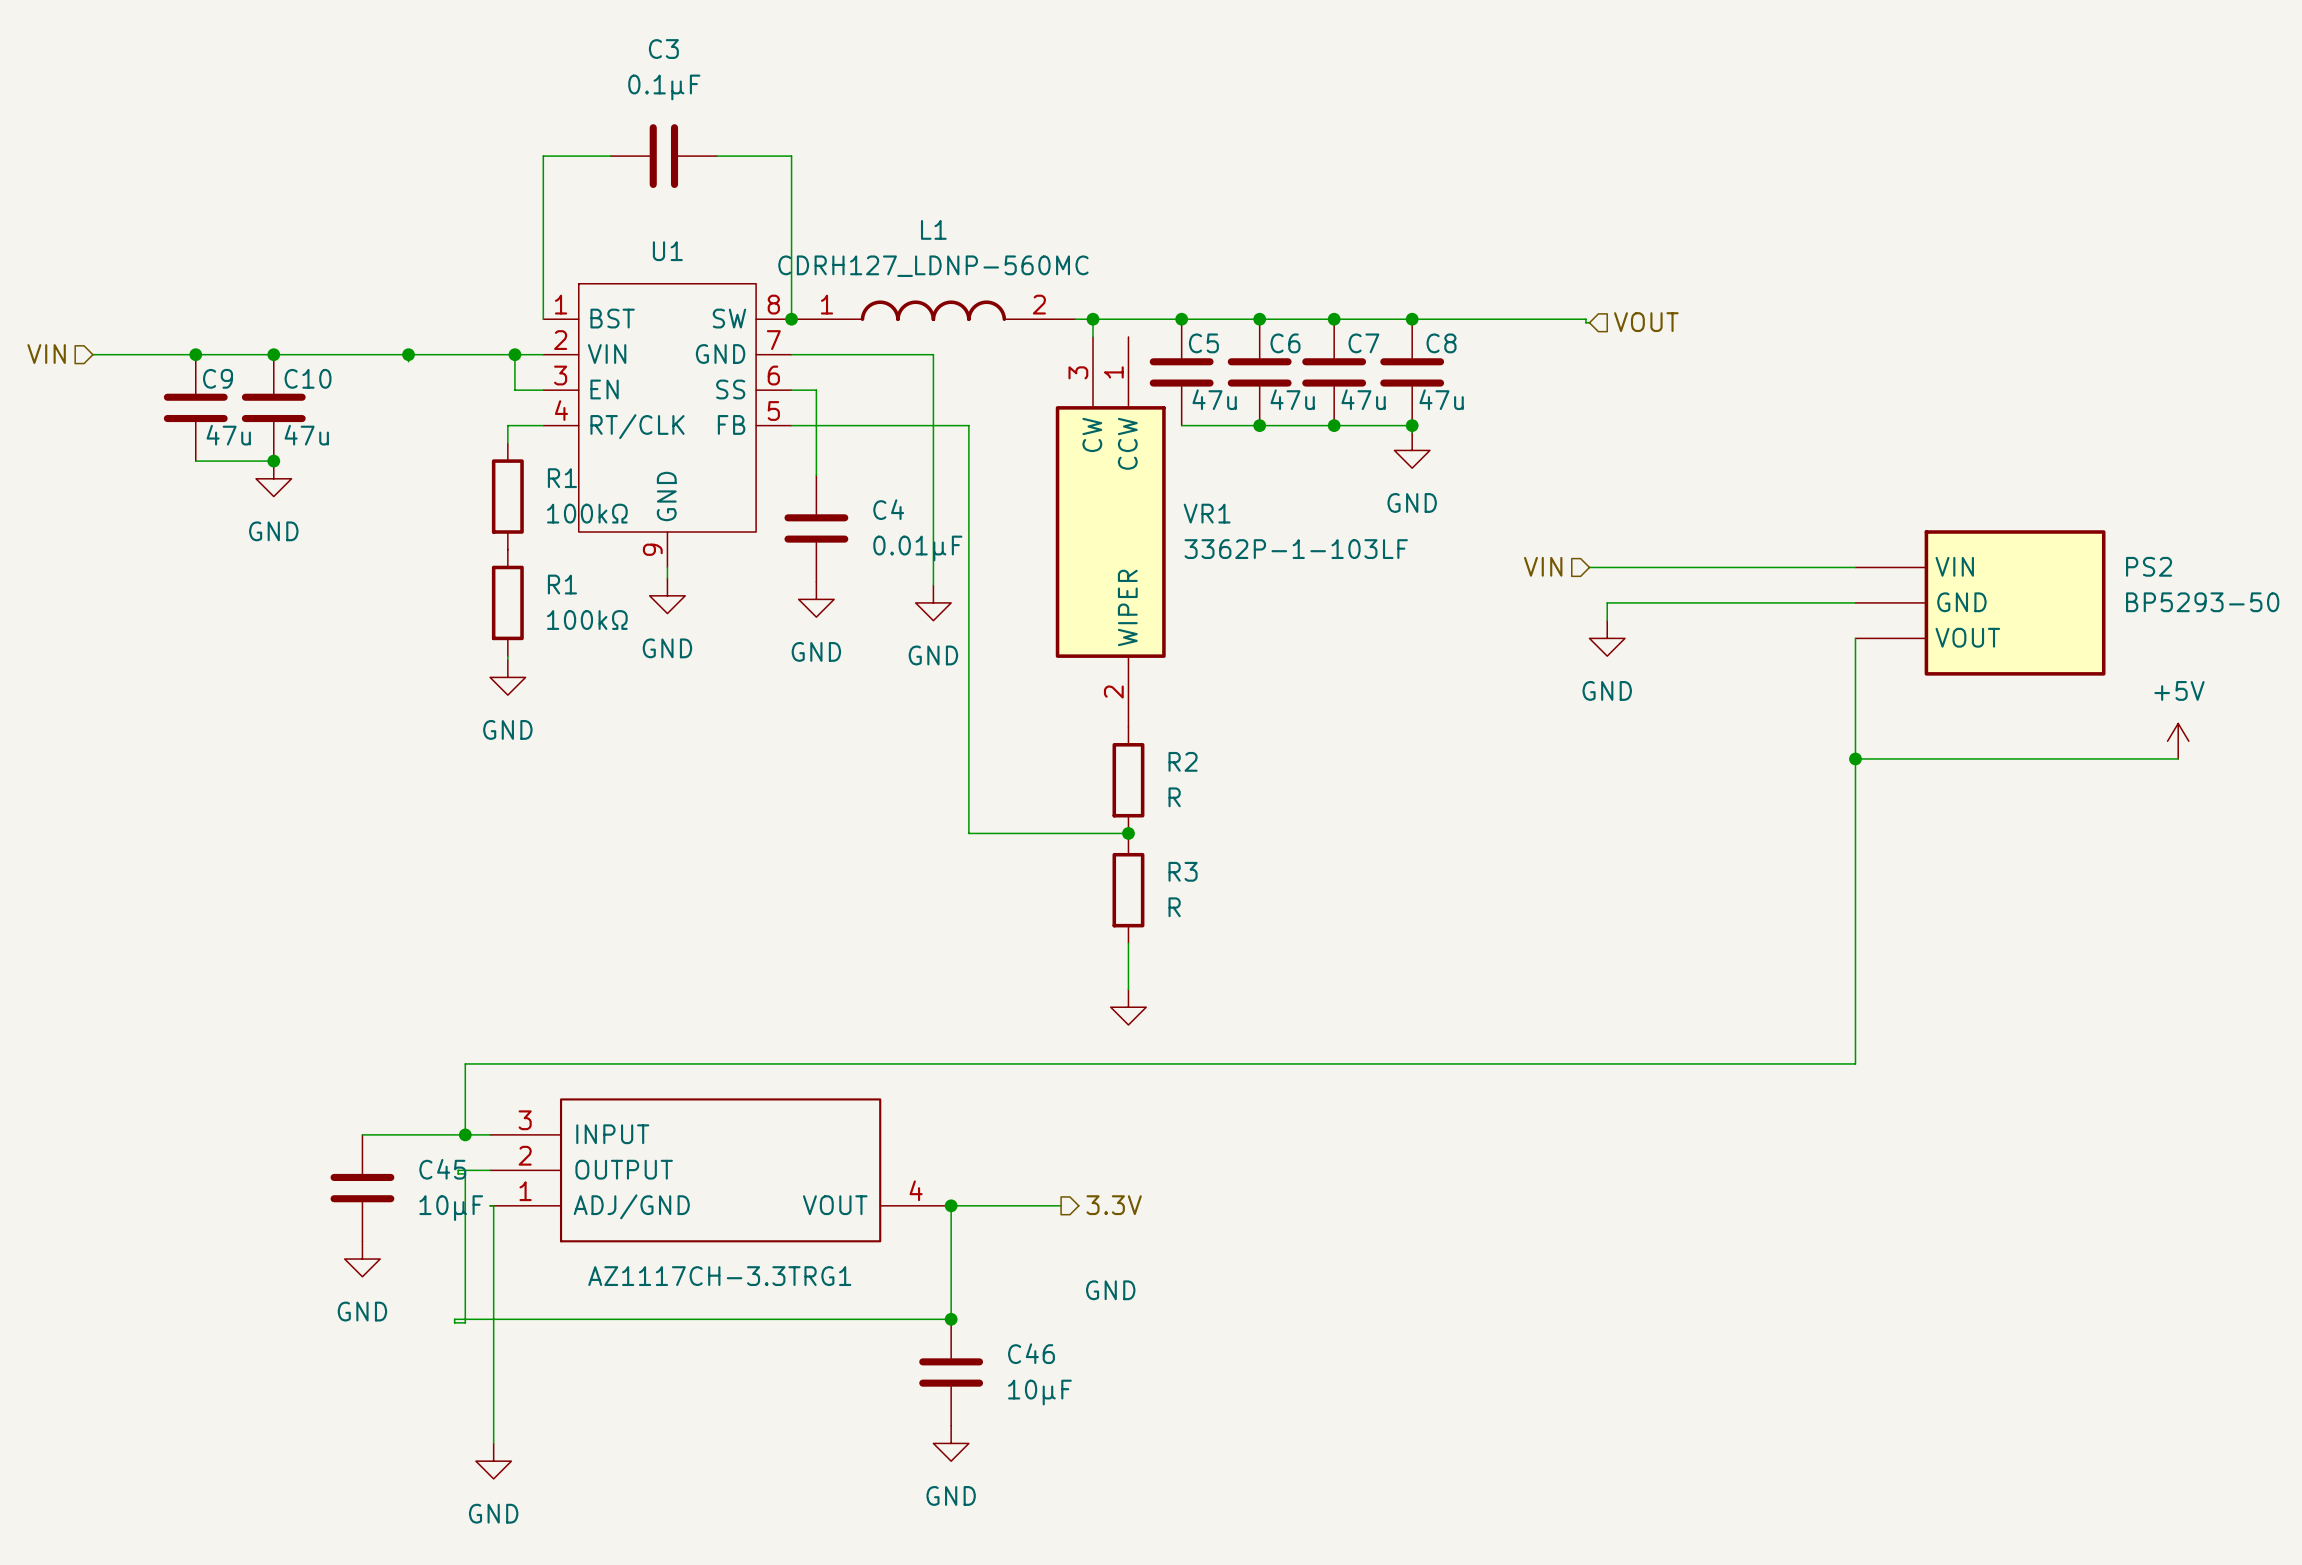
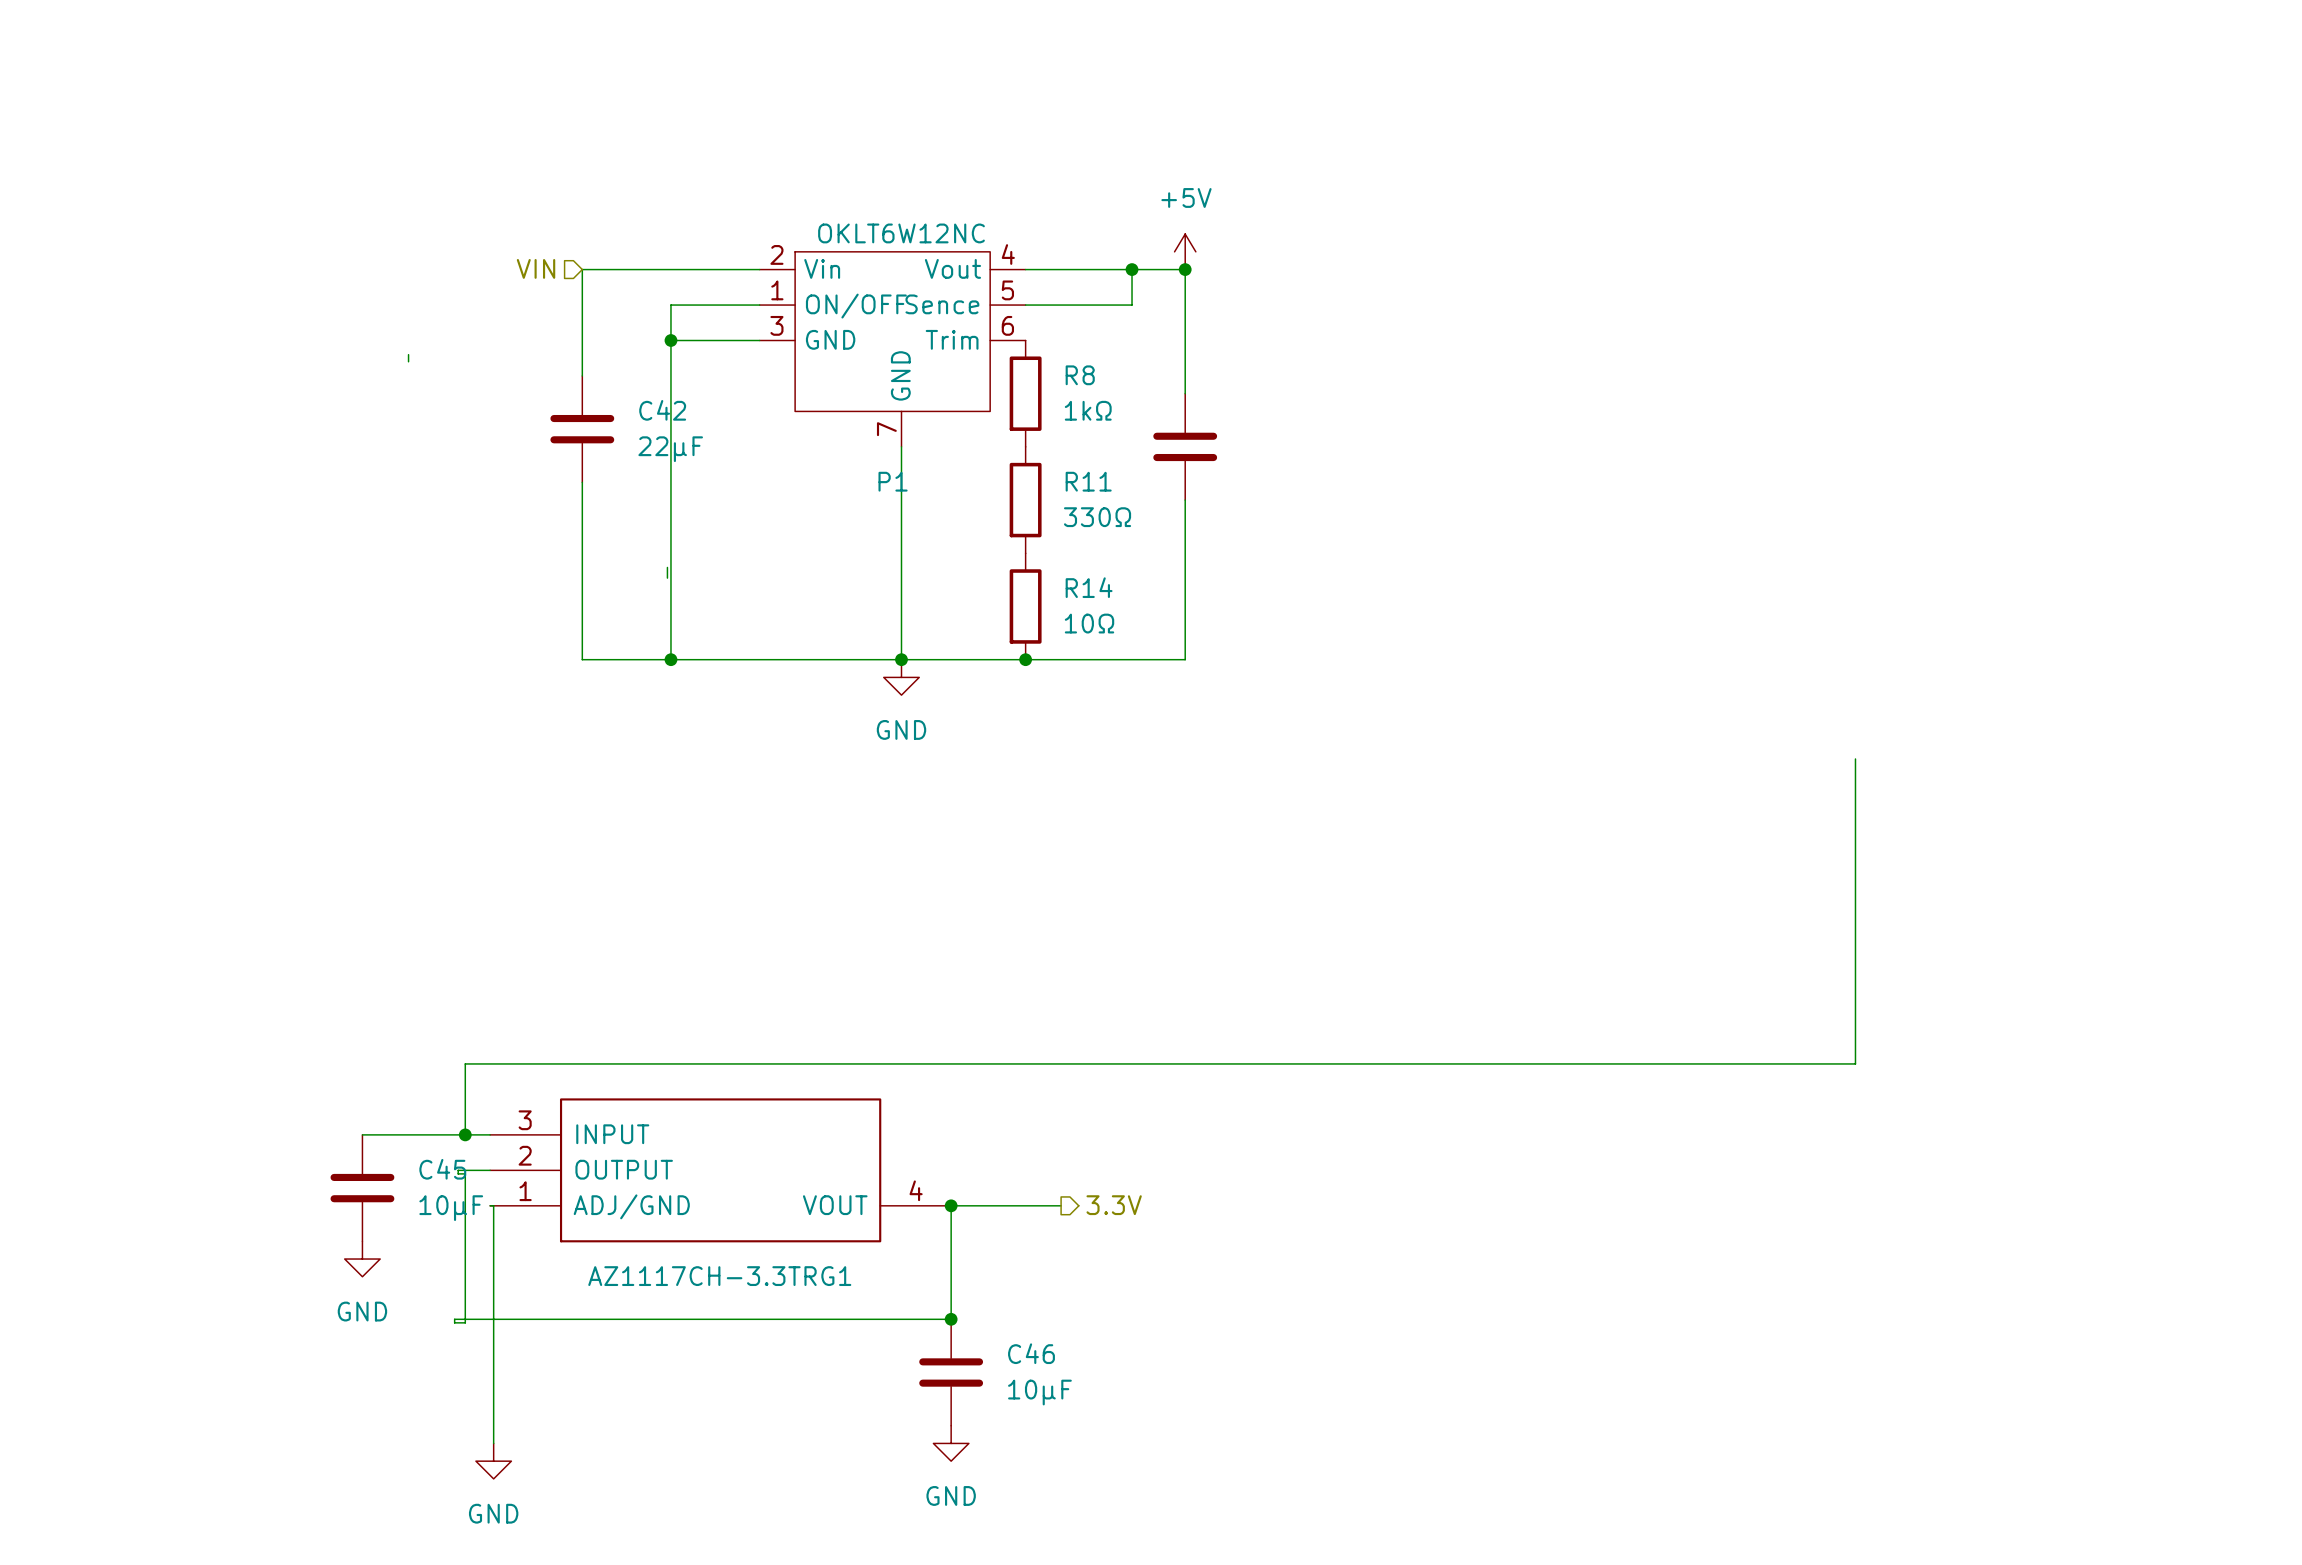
wire: (610, 156) (543, 156) (543, 319) -> none
C3: 0.1μF (663, 156) -> none
wire: (717, 156) (791, 156) (791, 319) -> none
power symbol: none -> +5V (1185, 251)
hierarchical label: none -> VIN (536, 268)
wire: none -> (759, 269) (582, 269) (582, 375)
wire: none -> (1025, 269) (1185, 269) (1185, 393)
wire: none -> (1132, 269) (1132, 305) (1025, 305)
junction: none -> (1132, 269)
junction: none -> (1185, 269)
wire: none -> (759, 305) (670, 305) (670, 659)
L1: CDRH127_LDNP-560MC (933, 310) -> none
junction: (791, 319) -> none
wire: (1075, 319) (1585, 319) (1585, 322) (1589, 322) -> none
wire: (1093, 319) (1093, 336) -> none
junction: (1093, 319) -> none
junction: (1181, 319) -> none
junction: (1259, 319) -> none
junction: (1334, 319) -> none
junction: (1412, 319) -> none
hierarchical label: VOUT (1646, 322) -> none
wire: none -> (670, 340) (759, 340)
junction: none -> (670, 340)
P1: none -> OKLT6W12NC (892, 349)
hierarchical label: VIN (46, 354) -> none
wire: (92, 354) (543, 354) -> none
junction: (195, 354) -> none
junction: (273, 354) -> none
junction: (408, 354) -> none
wire: (514, 354) (514, 390) (543, 390) -> none
junction: (514, 354) -> none
wire: (791, 354) (933, 354) (933, 585) -> none
C5: 47u (1181, 372) -> none
C6: 47u (1259, 372) -> none
C7: 47u (1334, 372) -> none
C8: 47u (1412, 372) -> none
wire: (791, 390) (816, 390) (816, 475) -> none
R8: none -> 1kΩ (1025, 393)
C9: 47u (195, 407) -> none
C10: 47u (273, 407) -> none
wire: (543, 425) (507, 425) (507, 443) -> none
U1: (667, 425) -> none
wire: (791, 425) (968, 425) (968, 833) (1128, 833) (1128, 837) -> none
wire: (1181, 425) (1412, 425) (1412, 432) -> none
junction: (1259, 425) -> none
junction: (1334, 425) -> none
junction: (1412, 425) -> none
C42: none -> 22μF (582, 429)
wire: none -> (901, 446) (901, 659)
part: none -> (1185, 446)
power symbol: GND (1412, 450) -> none
wire: (195, 461) (273, 461) -> none
junction: (273, 461) -> none
power symbol: GND (273, 478) -> none
wire: none -> (582, 482) (582, 659) (1185, 659) (1185, 500)
R1: 100kΩ (507, 496) -> none
R11: none -> 330Ω (1025, 500)
C4: 0.01μF (816, 528) -> none
VR1: 3362P-1-103LF (1110, 532) -> none
hierarchical label: VIN (1543, 566) -> none
wire: (1589, 567) (1855, 567) -> none
power symbol: GND (667, 595) -> none
power symbol: GND (816, 599) -> none
R1: 100kΩ (507, 602) -> none
power symbol: GND (933, 602) -> none
wire: (1855, 602) (1607, 602) (1607, 620) -> none
PS2: BP5293-50 (1980, 602) -> none
R14: none -> 10Ω (1025, 606)
power symbol: GND (1607, 638) -> none
wire: (1855, 638) (1855, 758) (2178, 758) -> none
wire: (507, 656) (507, 659) -> none
junction: none -> (670, 659)
junction: none -> (901, 659)
junction: none -> (1025, 659)
power symbol: GND (507, 677) -> none
power symbol: none -> GND (901, 677)
power symbol: +5V (2178, 741) -> none
junction: (1855, 758) -> none
R2: R (1128, 780) -> none
junction: (1128, 833) -> none
R3: R (1128, 890) -> none
wire: (1128, 943) (1128, 989) -> none
power symbol: GND (1128, 1007) -> none

